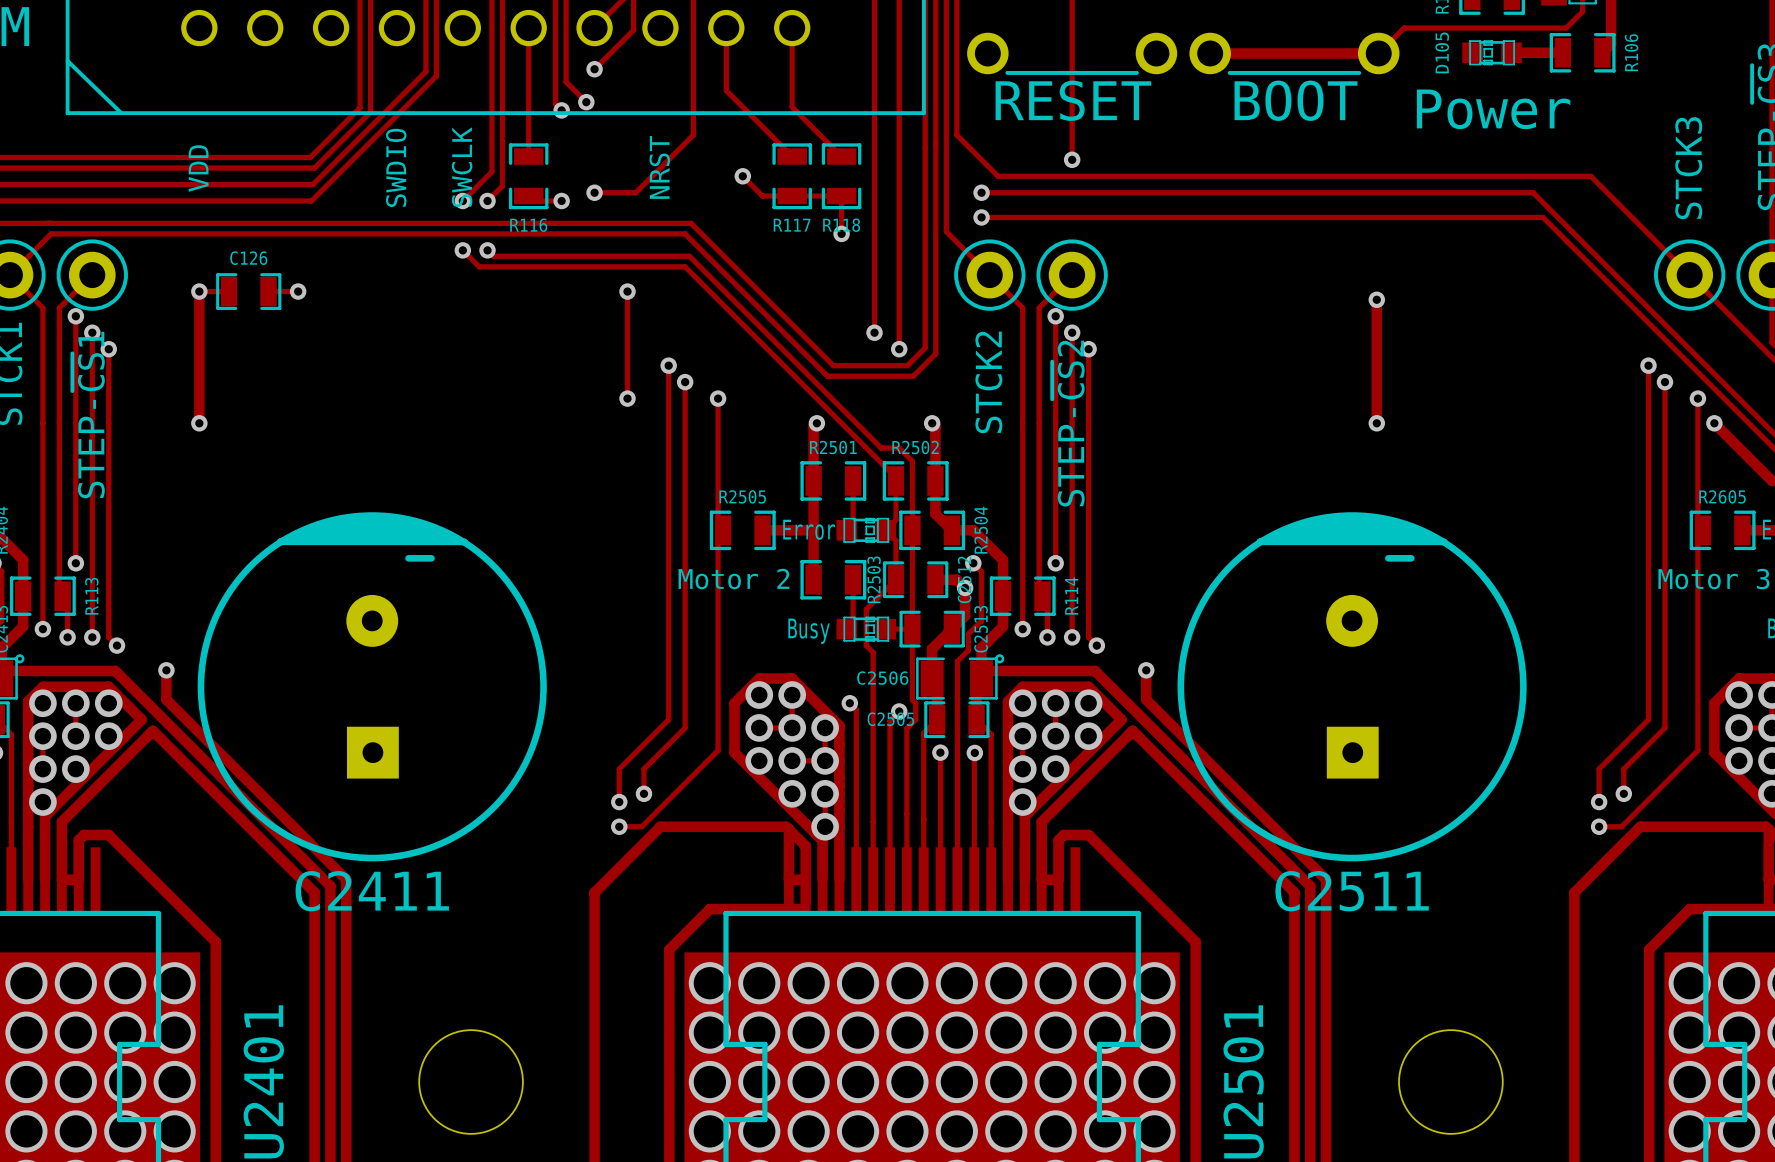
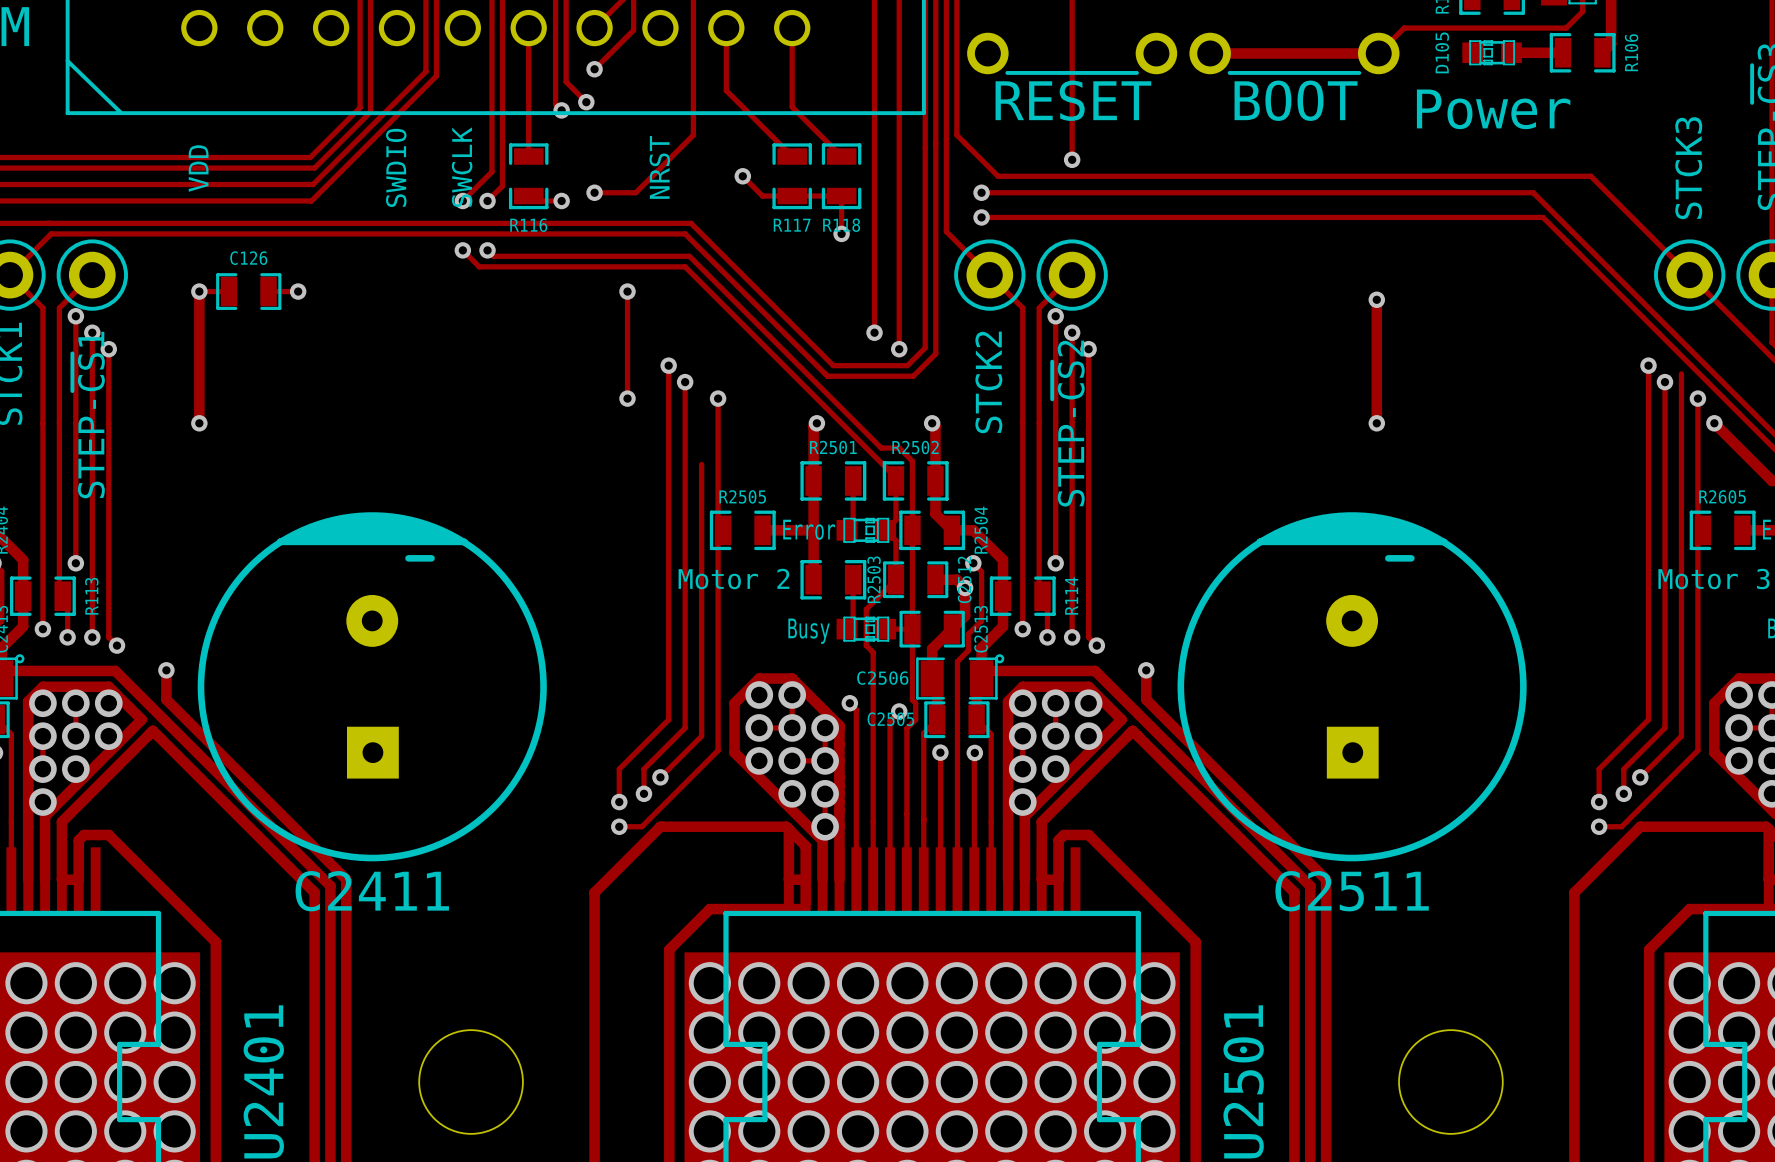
track: none -> (1681, 373) (1681, 736) (1640, 777)
track: none -> (701, 464) (701, 736) (660, 777)
via: none -> (660, 777)
via: none -> (1640, 777)

